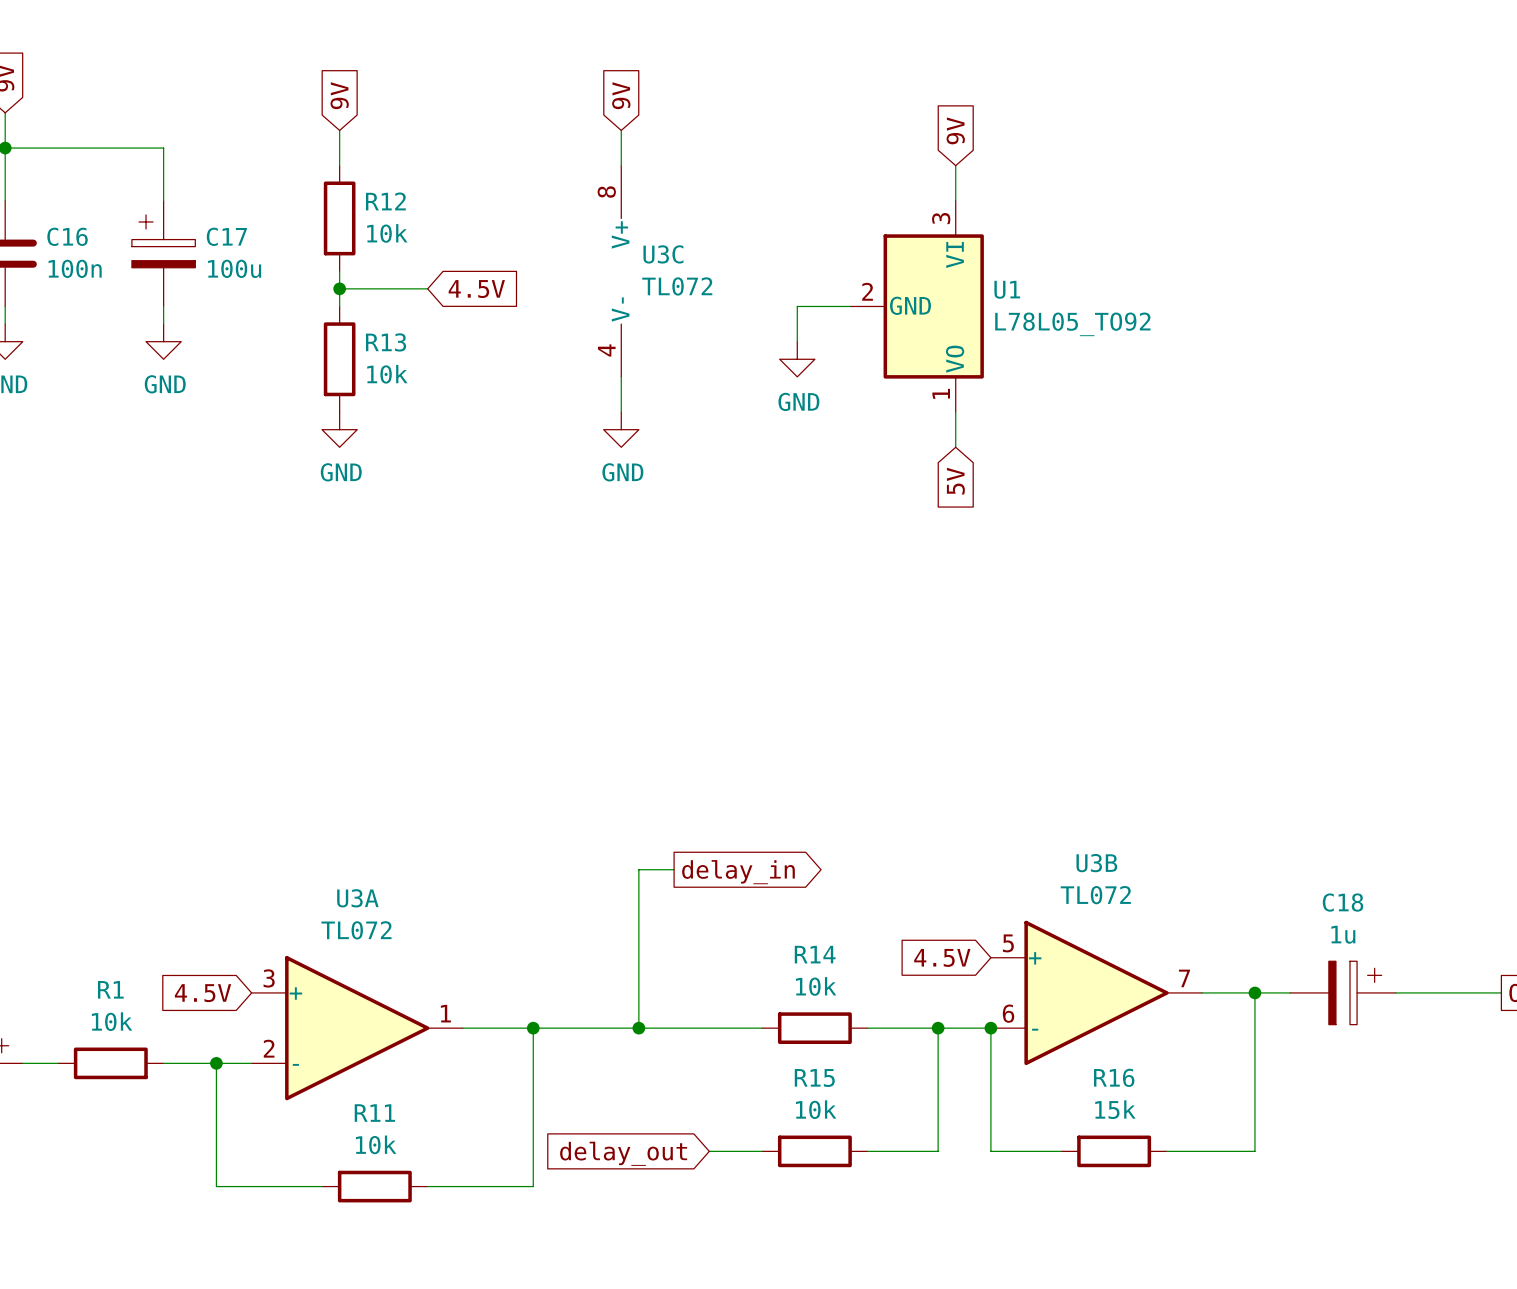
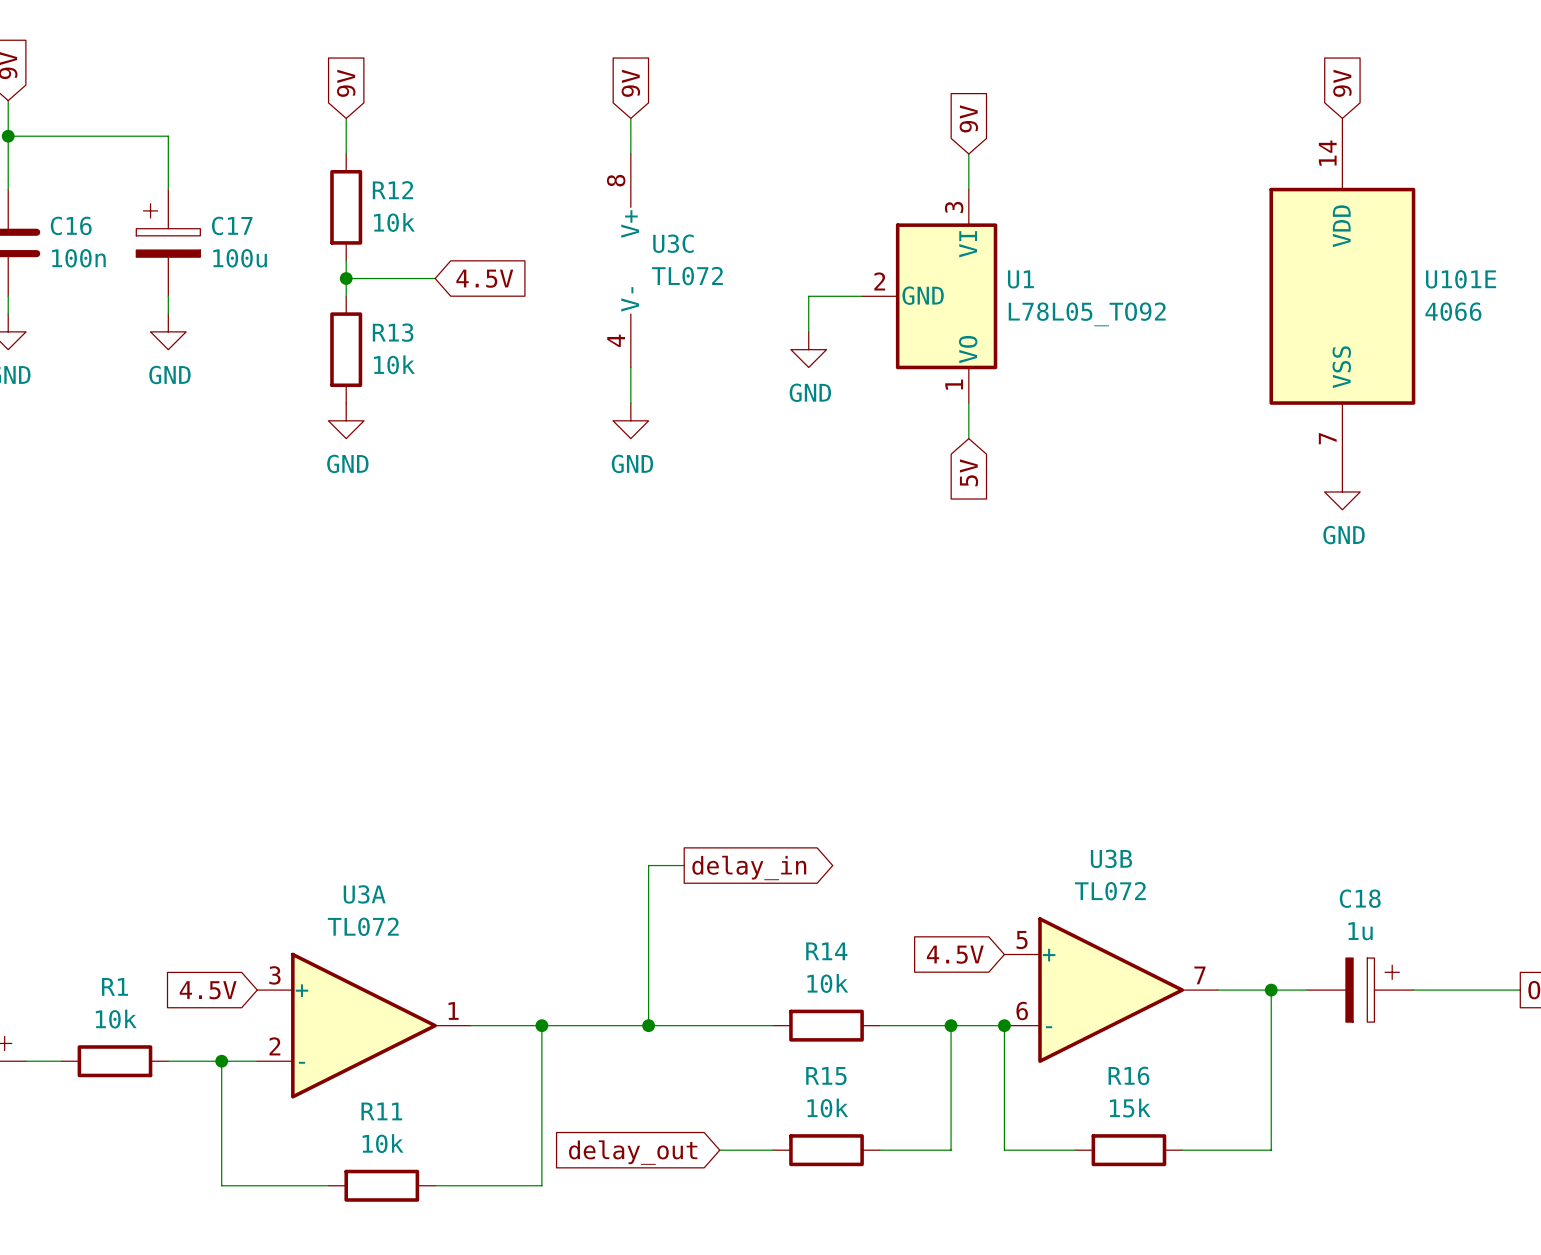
global label: none -> 9V (1342, 83)
U101E: none -> 4066 (1342, 296)
power symbol: none -> GND (1342, 491)

